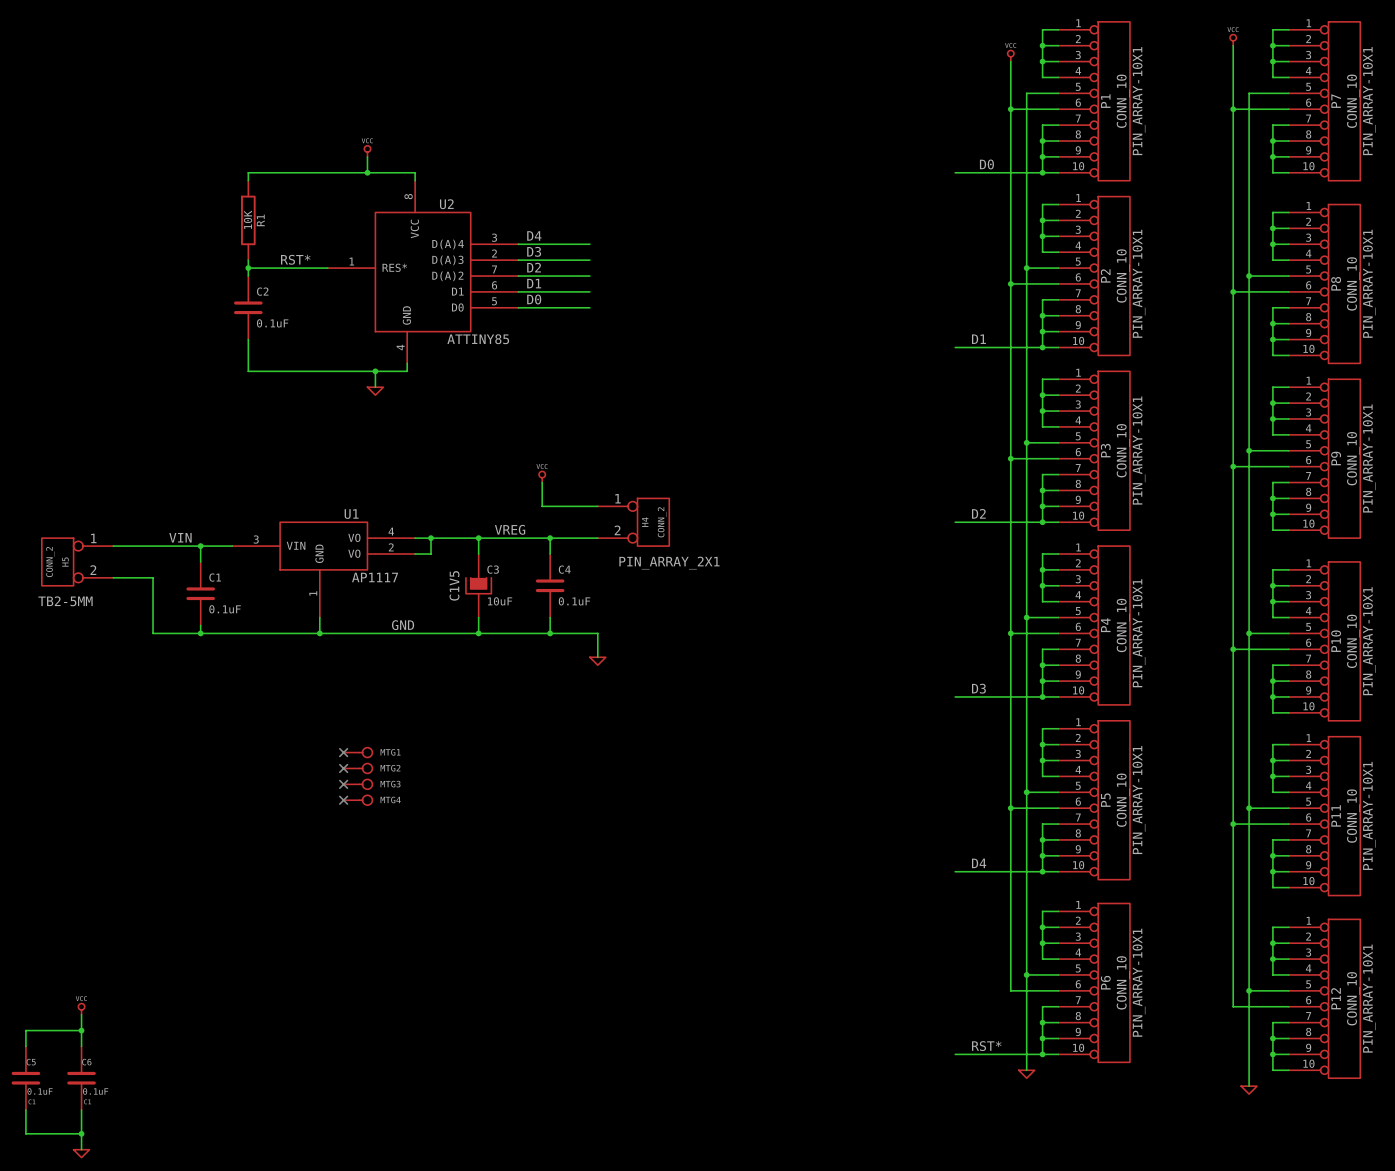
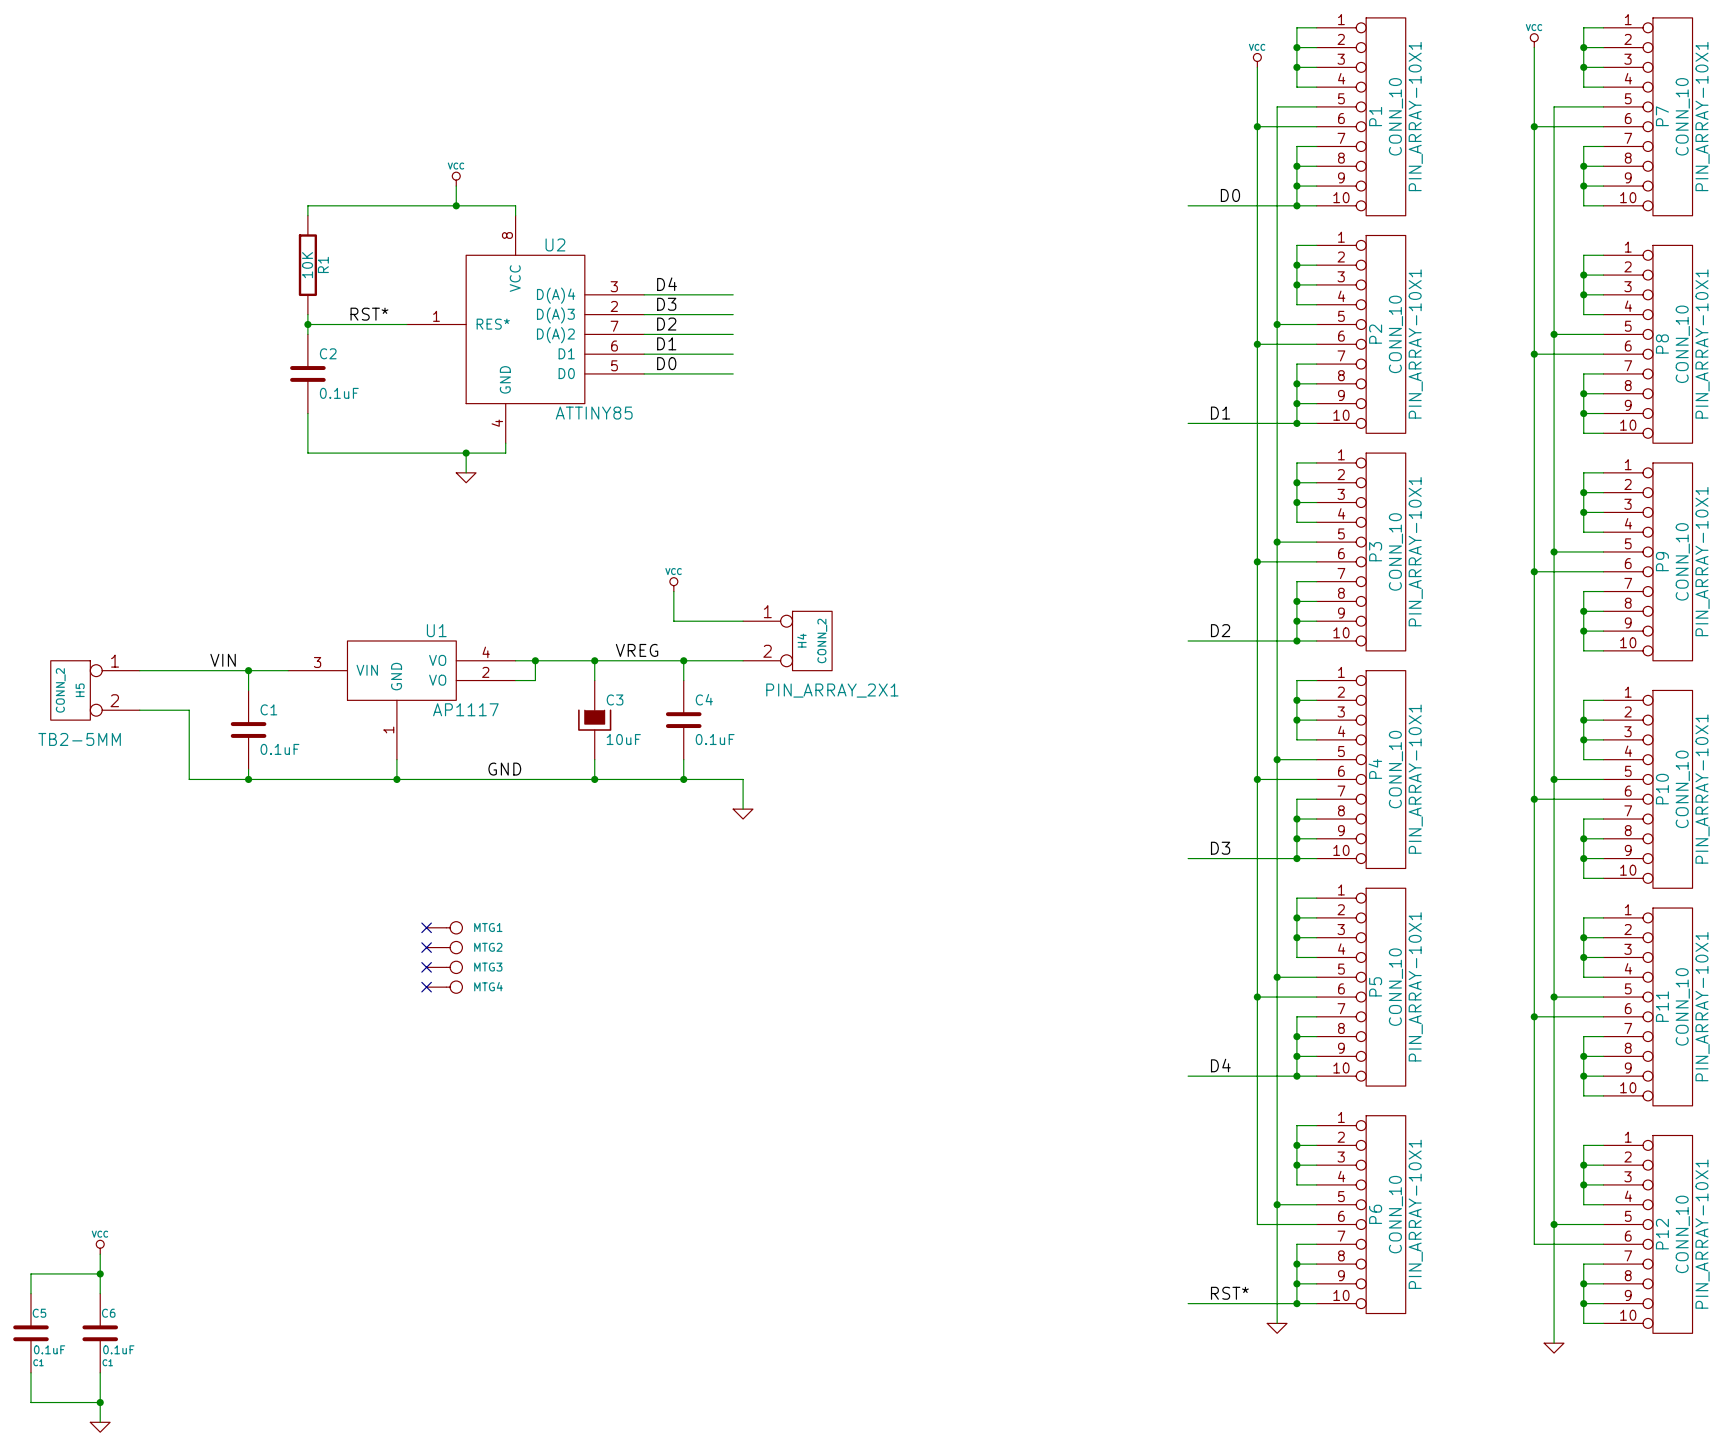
C3 text: C1V5 (454, 585) -> none

